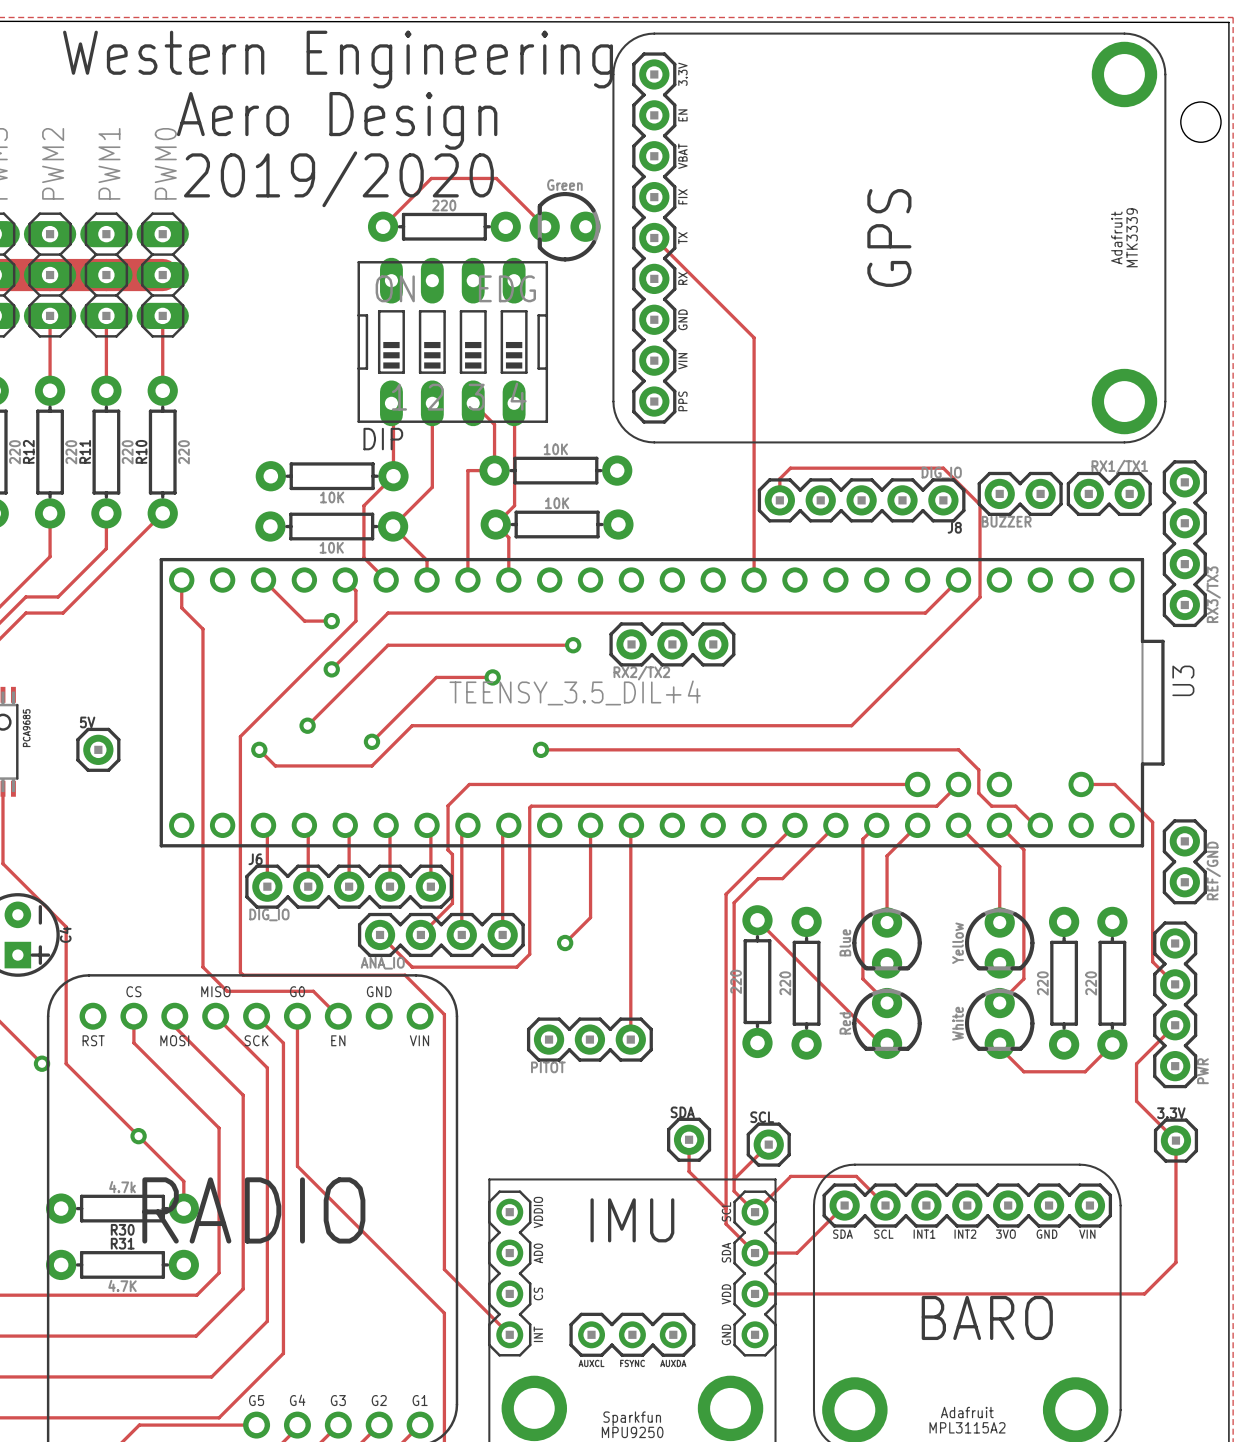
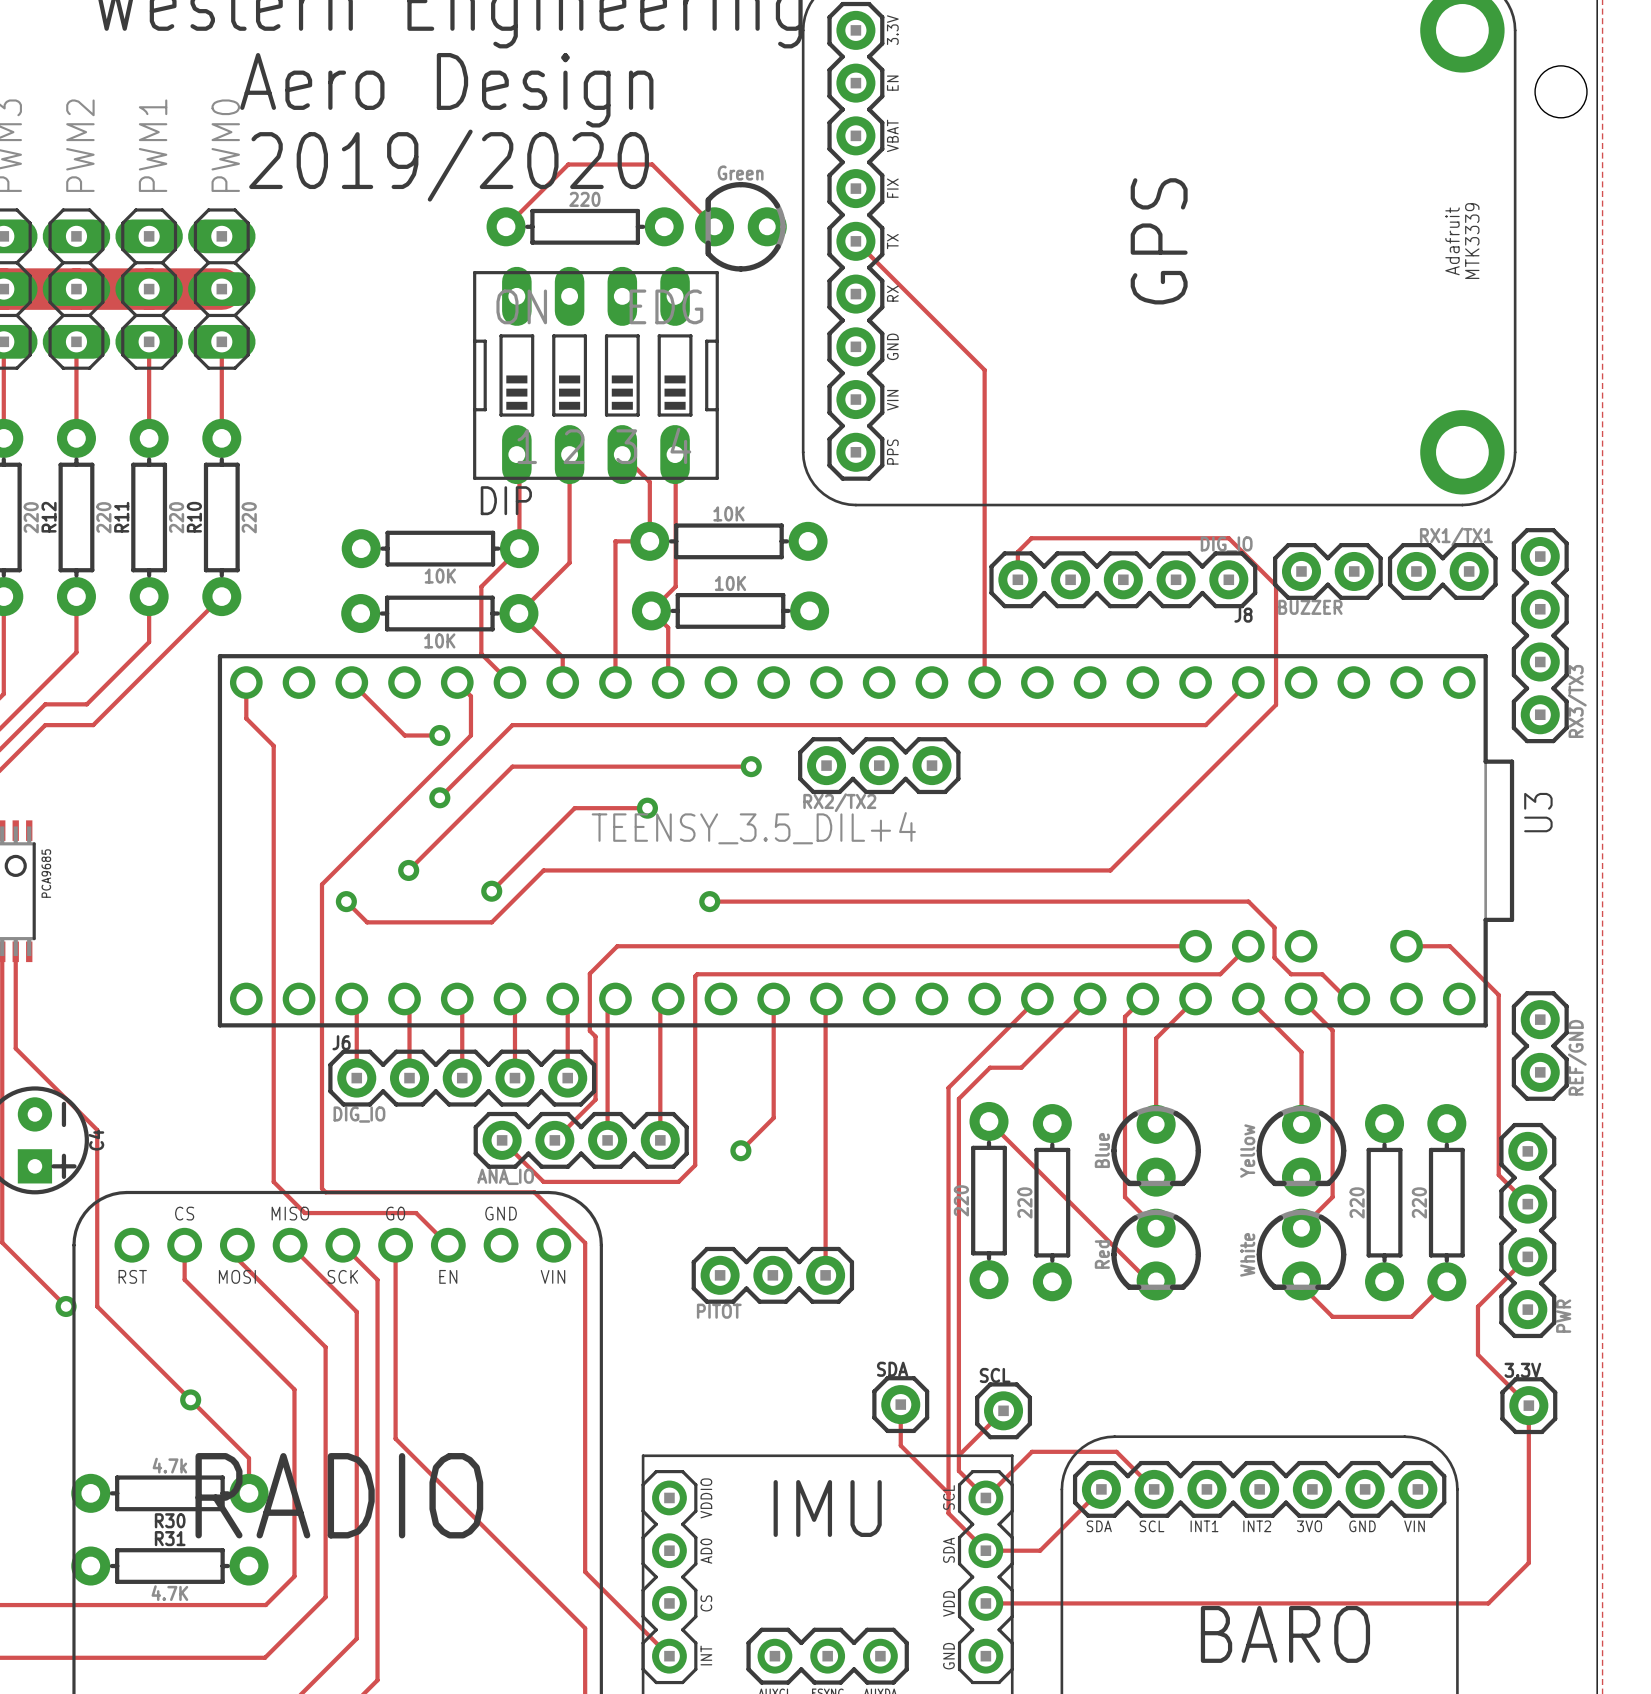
5V: (98, 749) -> none

